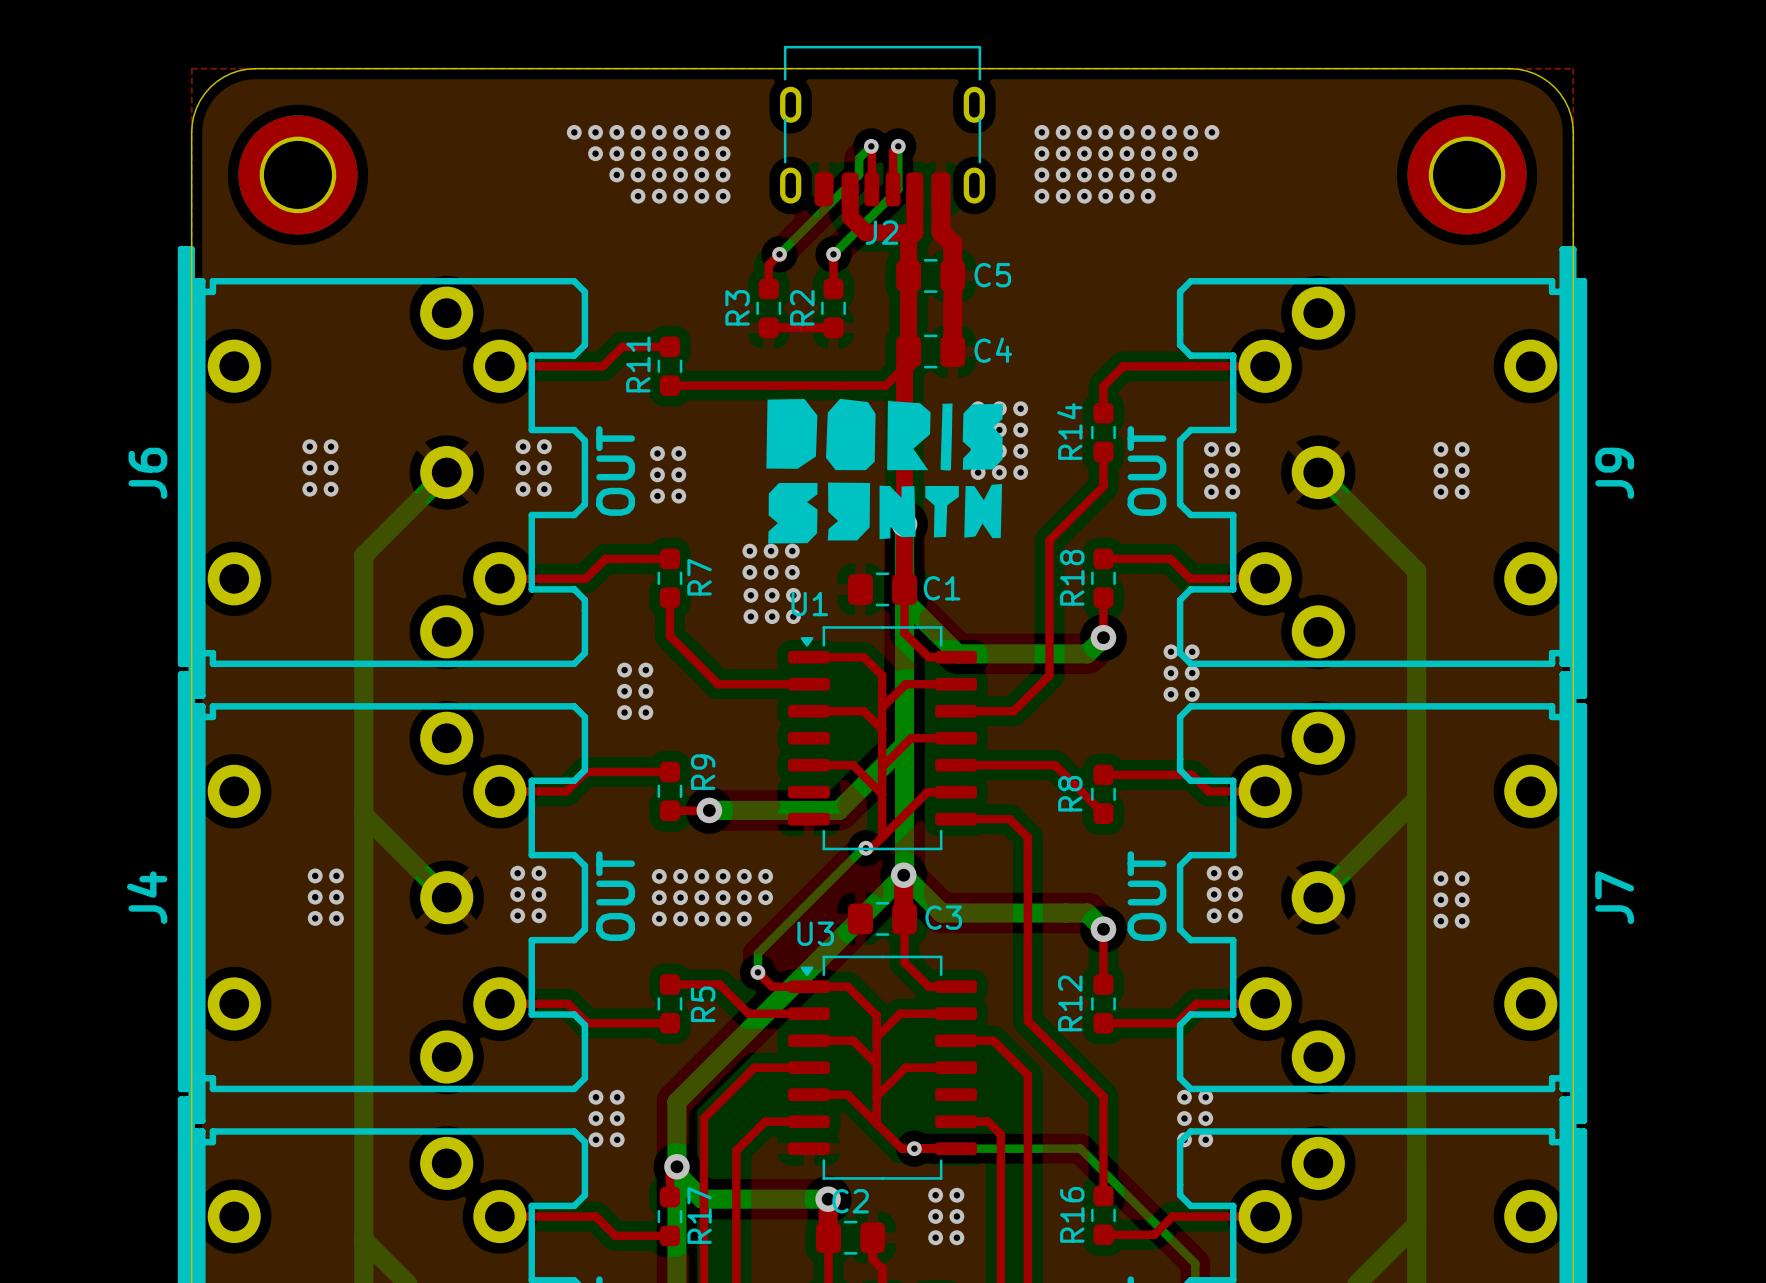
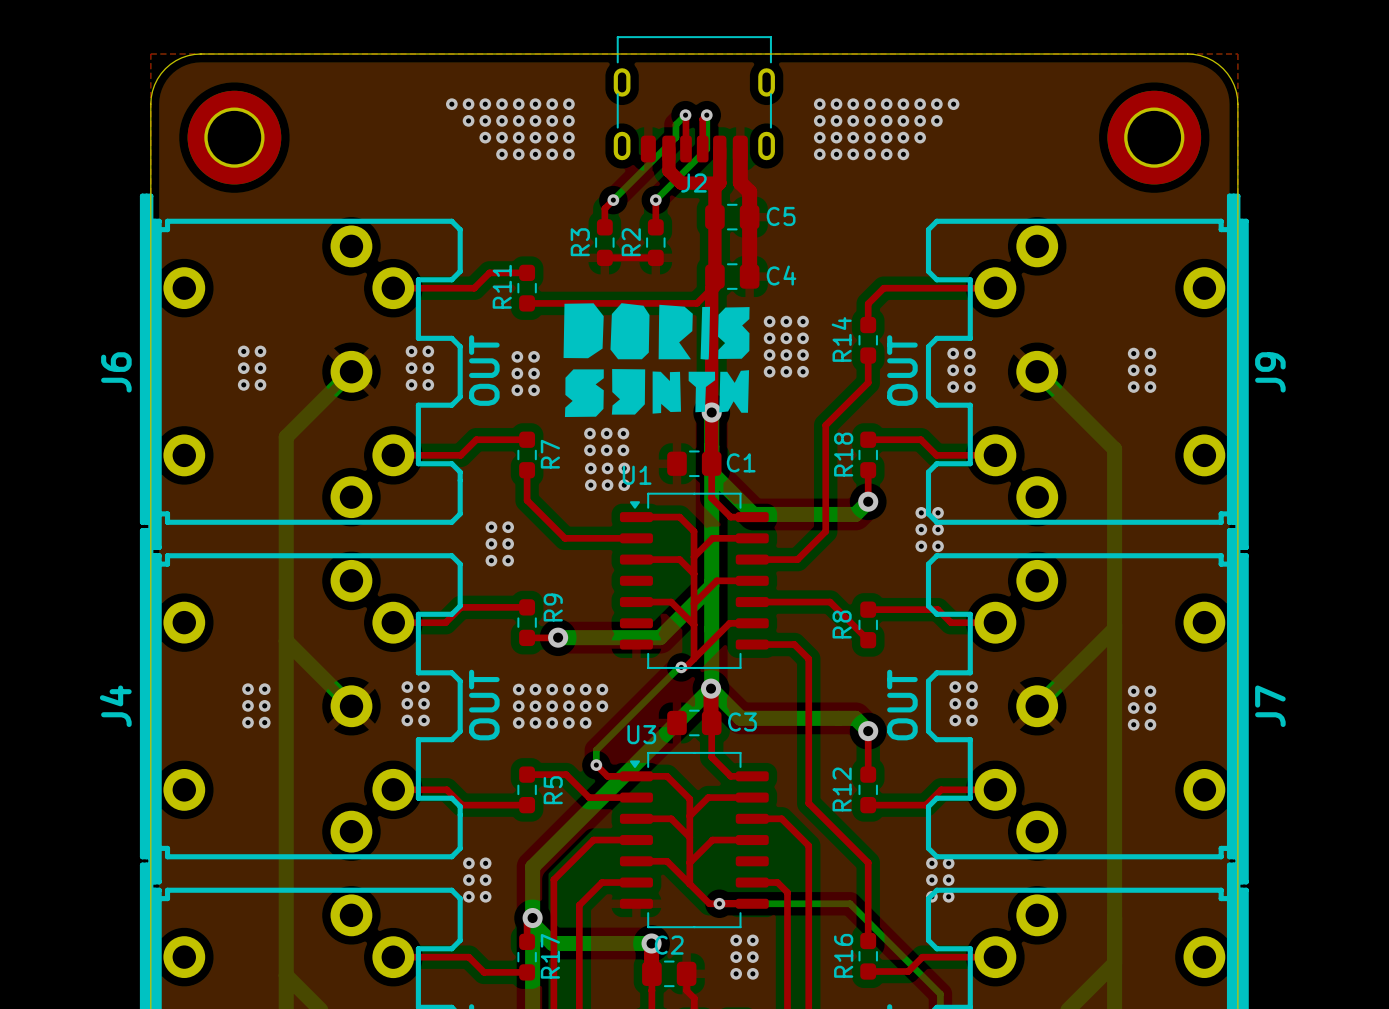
drawing position: (791, 433) -> (583, 330)
drawing position: (850, 434) -> (629, 331)
drawing position: (908, 435) -> (675, 332)
drawing position: (946, 436) -> (705, 333)
drawing position: (982, 436) -> (733, 333)
drawing position: (848, 511) -> (628, 391)
drawing position: (942, 511) -> (701, 392)
drawing position: (983, 511) -> (734, 391)
drawing position: (897, 512) -> (666, 392)
drawing position: (792, 513) -> (584, 393)

